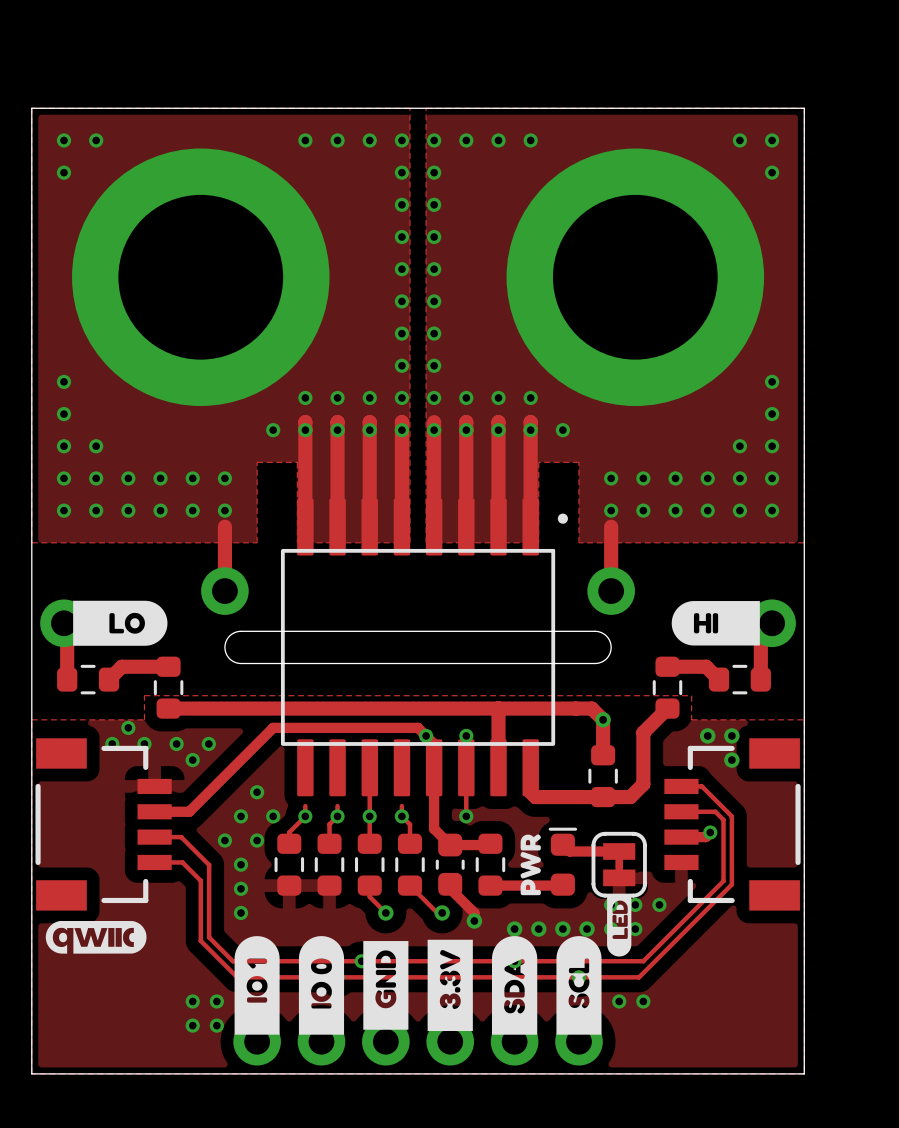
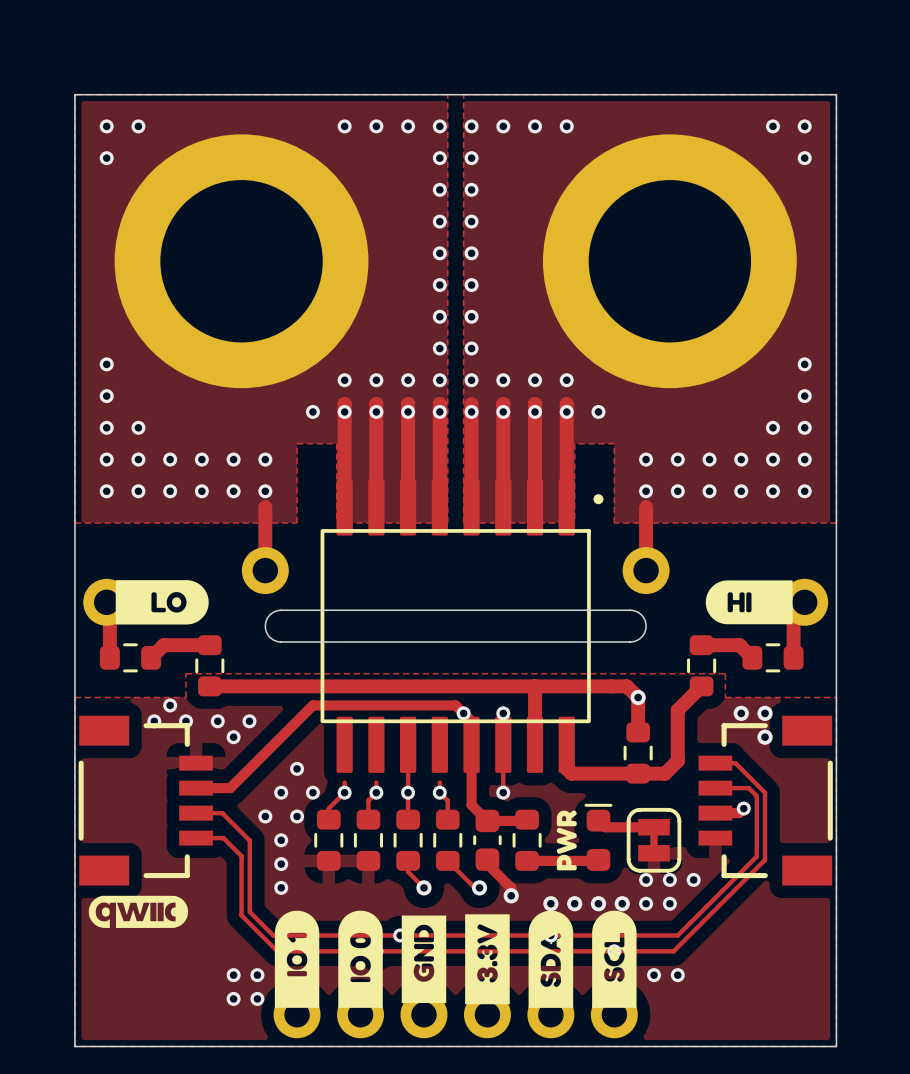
drawing: [607, 895, 632, 957] -> none

